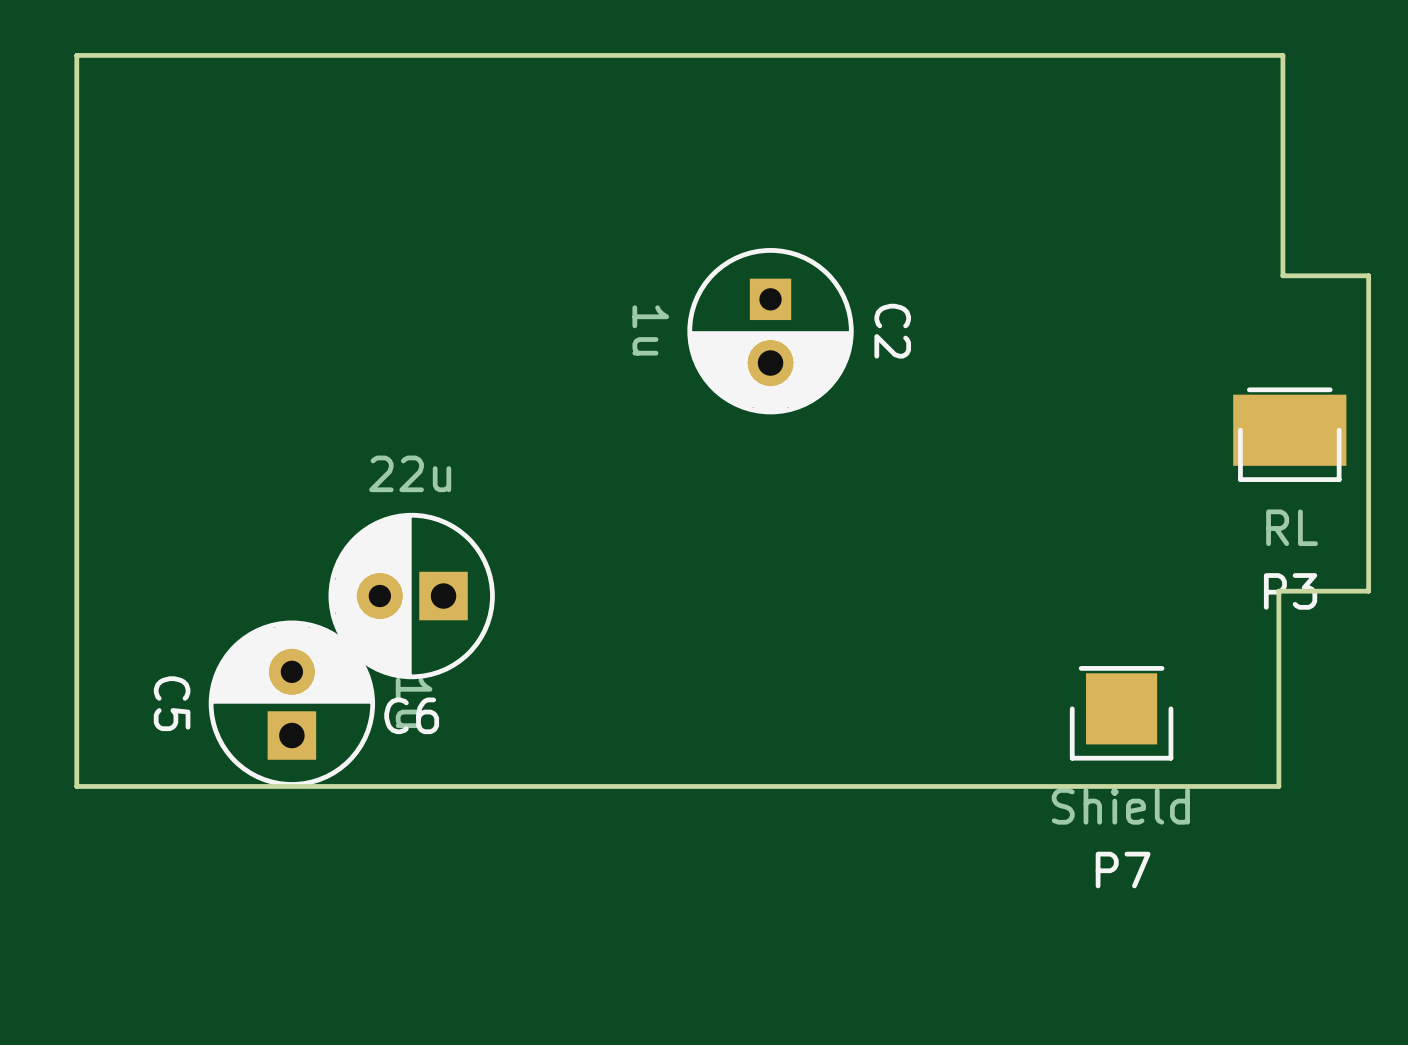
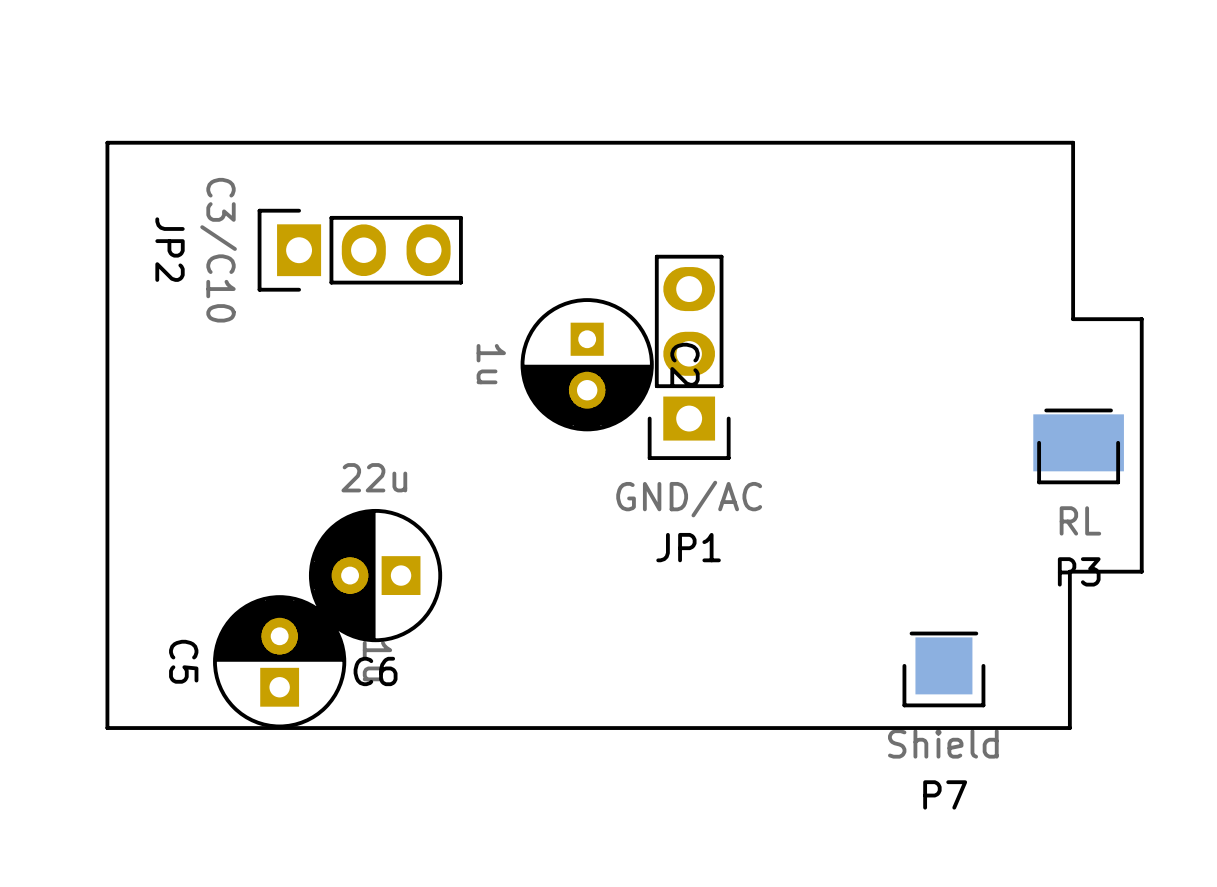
JP2: none -> C3/C10 (360, 250)
JP1: none -> GND/AC (689, 357)
C2 position: (770, 331) -> (587, 364)

